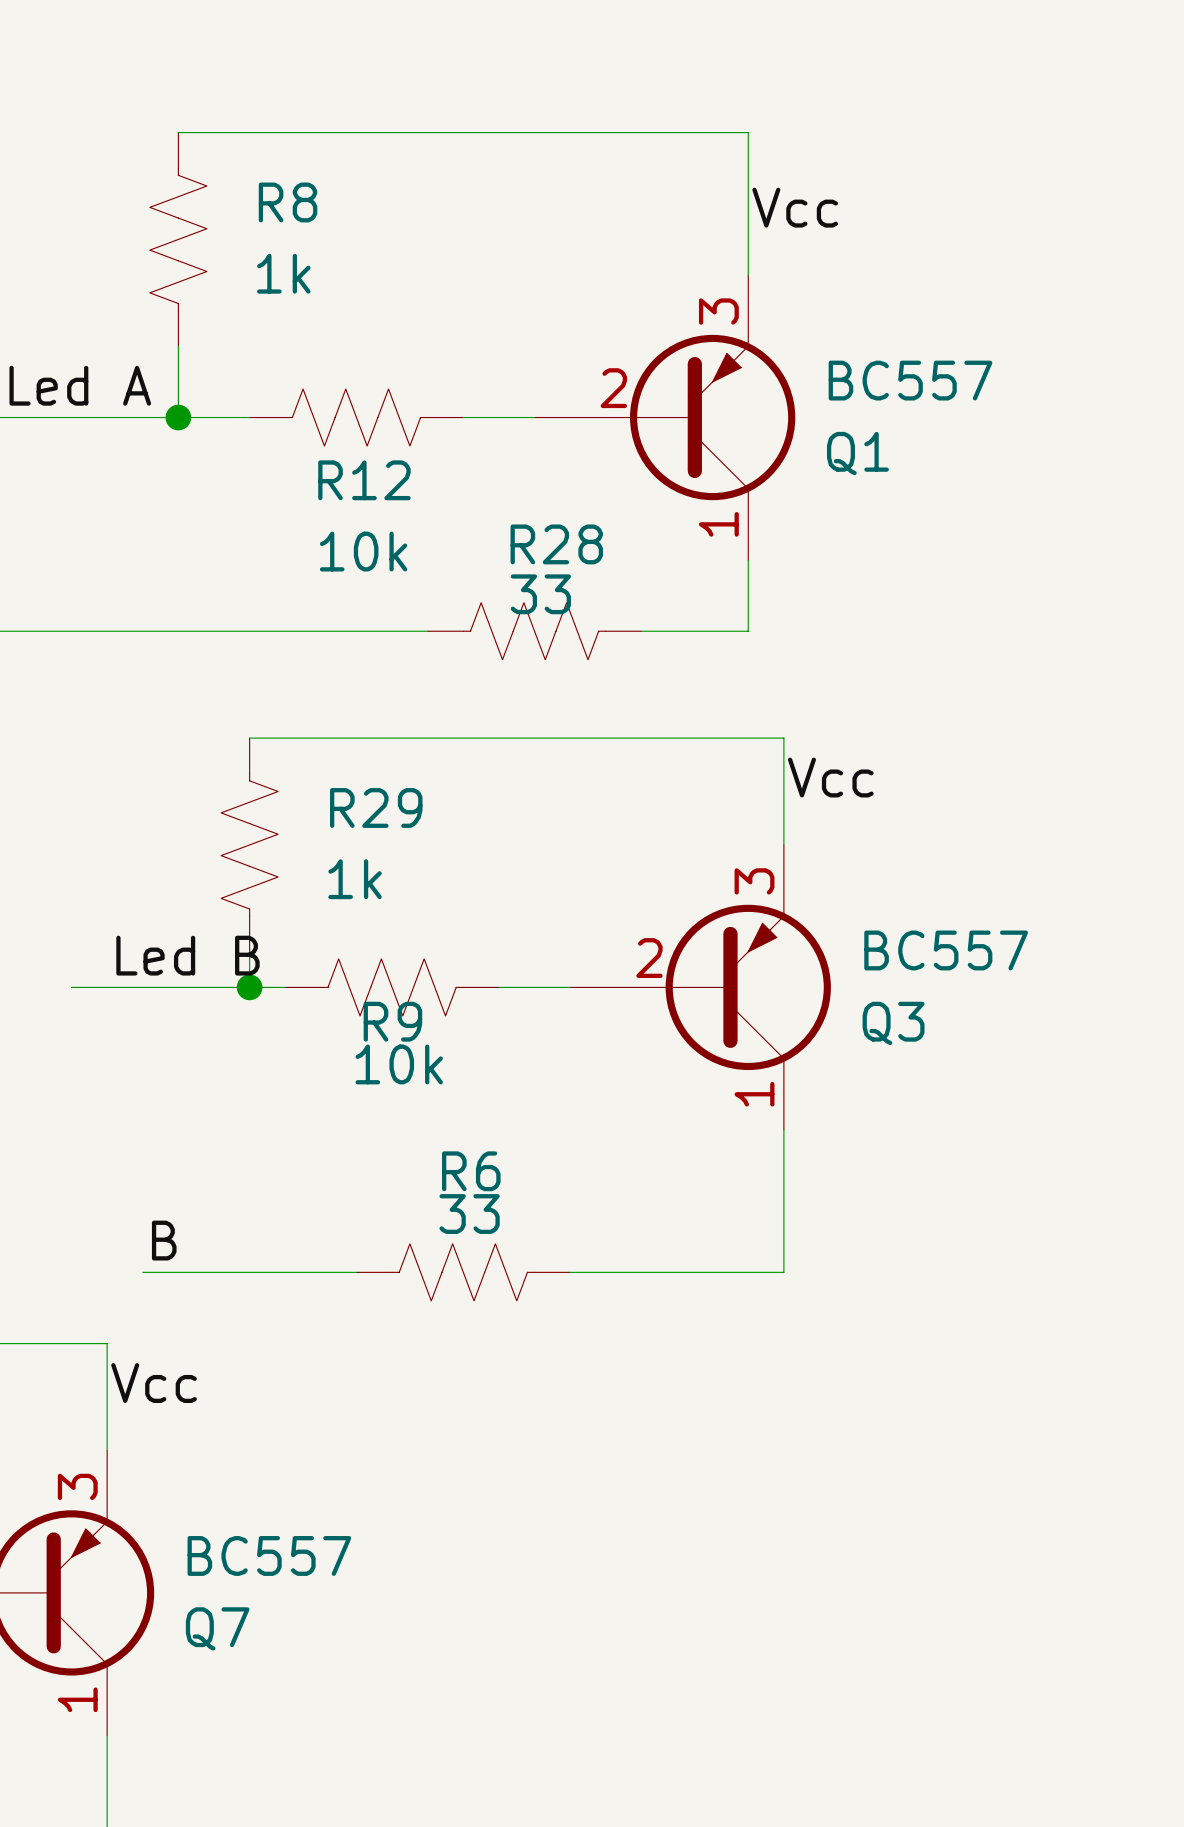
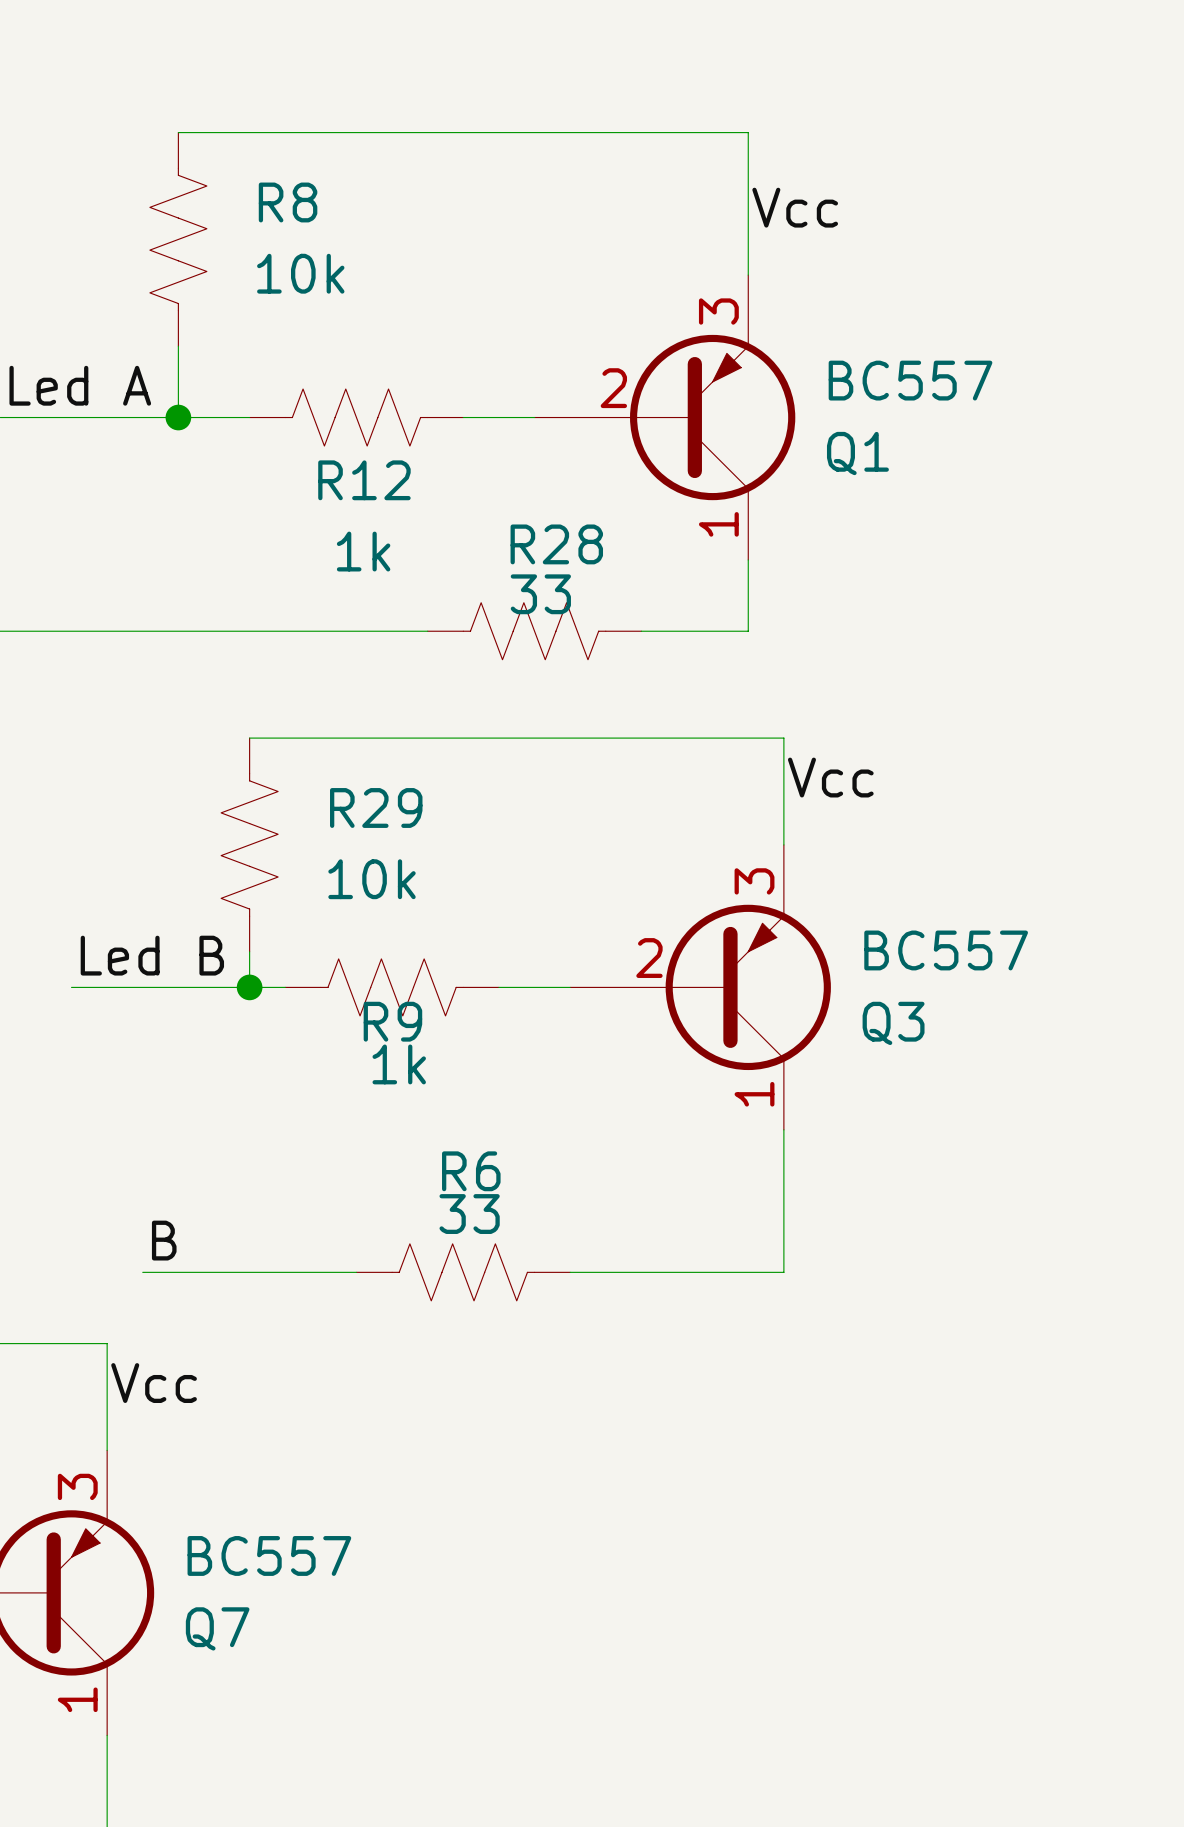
R8 value: 1k (283, 273) -> 10k (300, 273)
R12 value: 10k (363, 551) -> 1k (363, 551)
R29 value: 1k (355, 879) -> 10k (372, 879)
label position: Led B (187, 955) -> Led B (152, 955)
R9 value: 10k (399, 1064) -> 1k (399, 1064)

